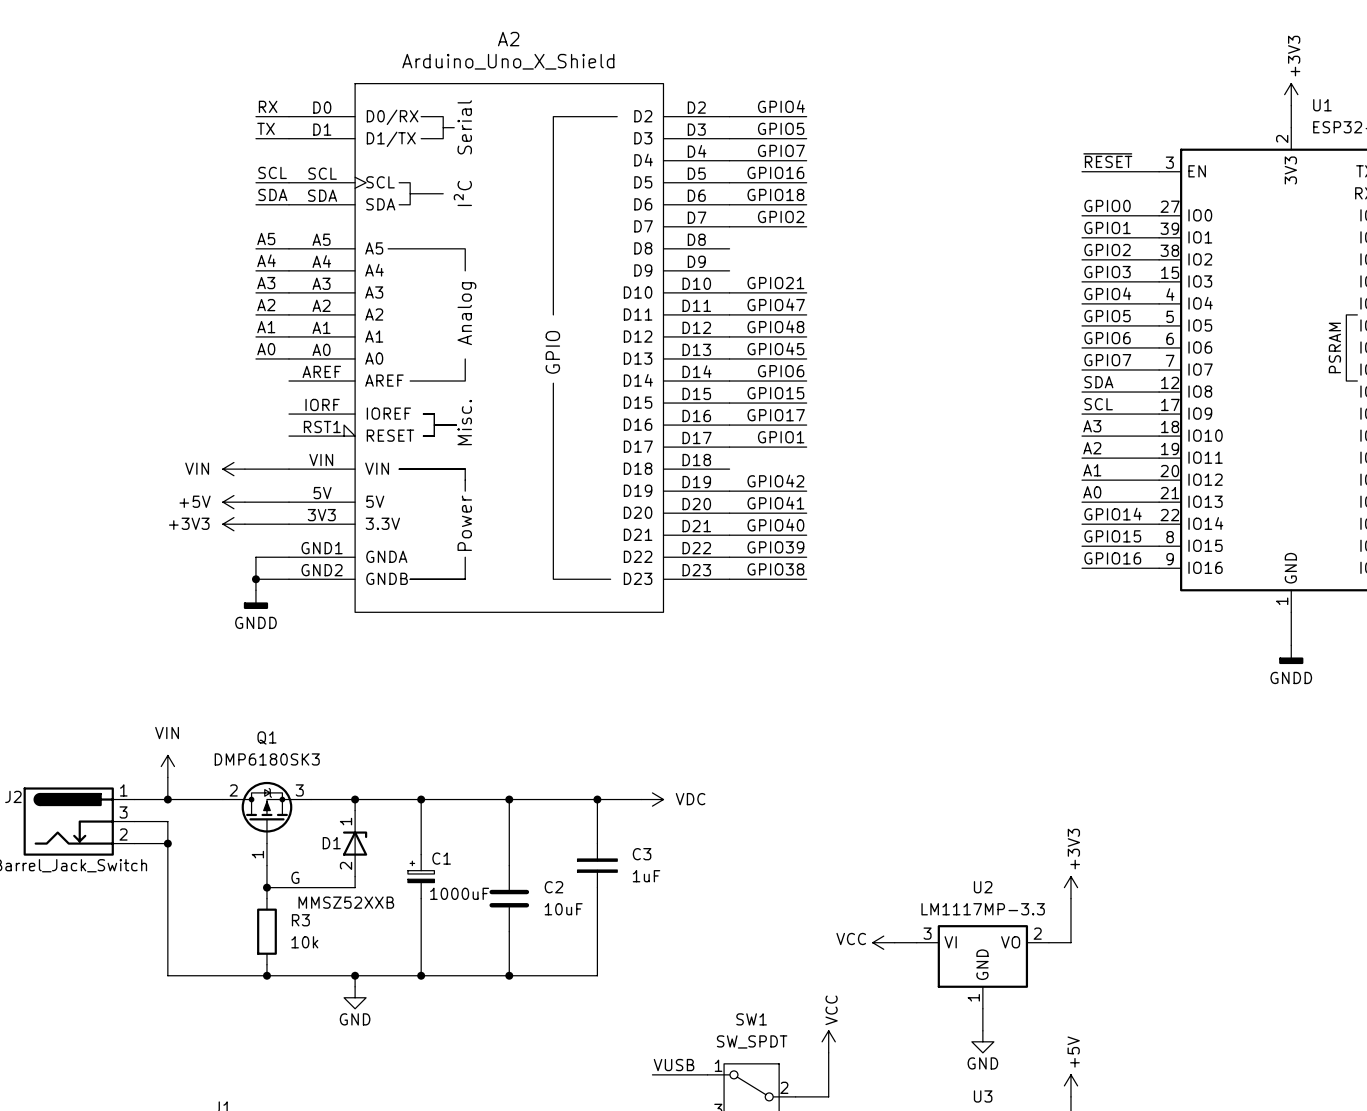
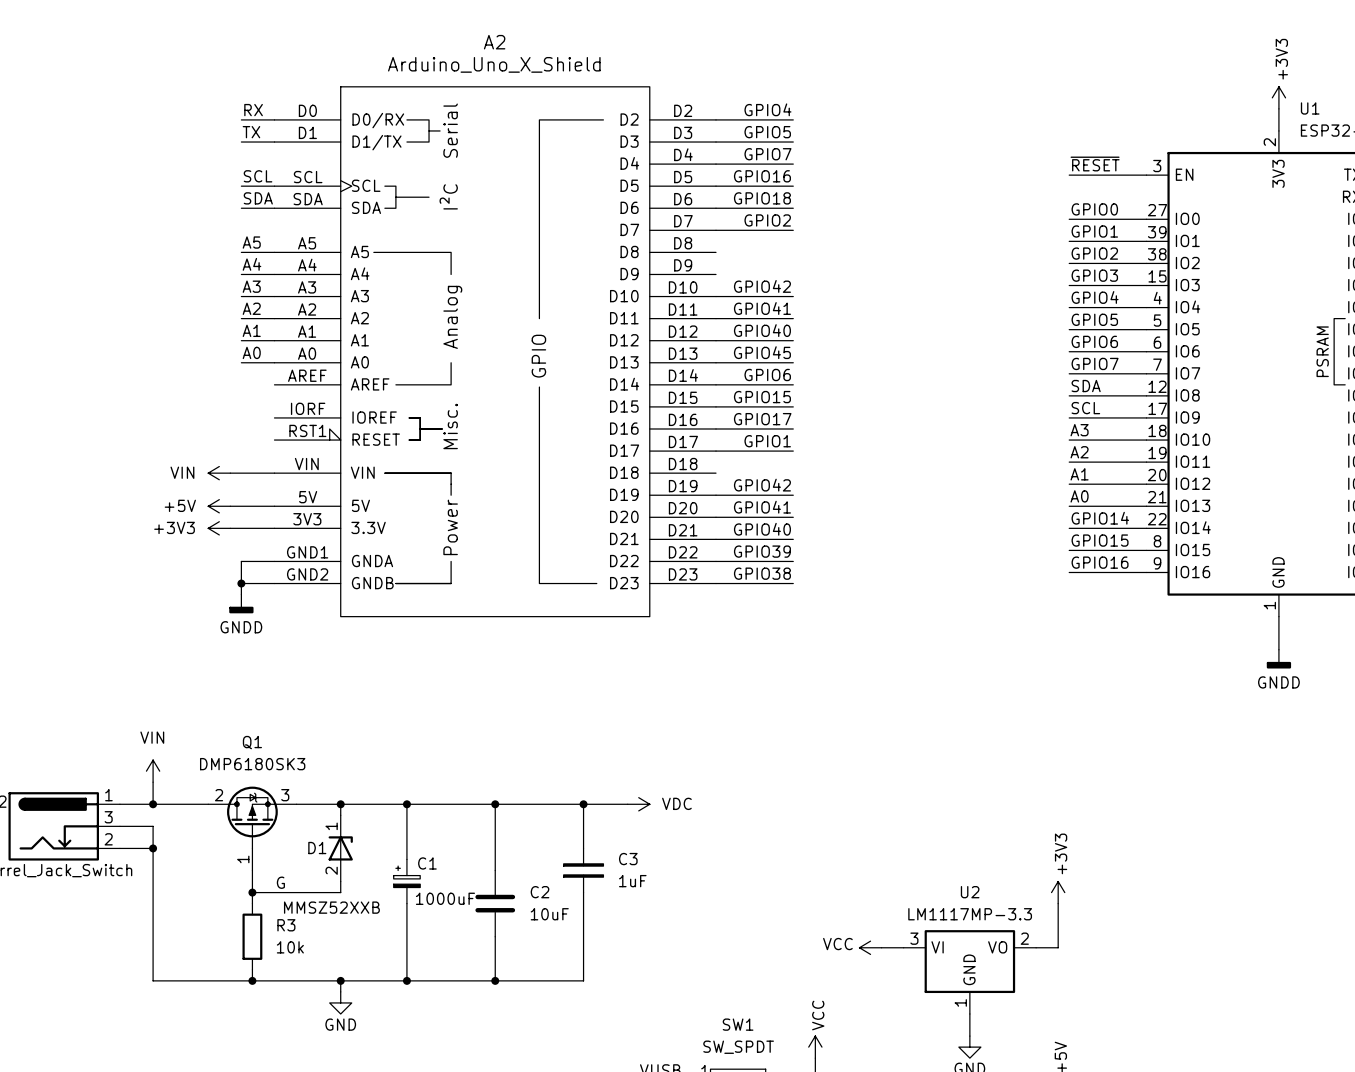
label: GPIO21 (775, 283) -> GPIO42 (762, 286)
label: GPIO47 (776, 304) -> GPIO41 (762, 308)
label: GPIO48 (775, 326) -> GPIO40 (762, 330)

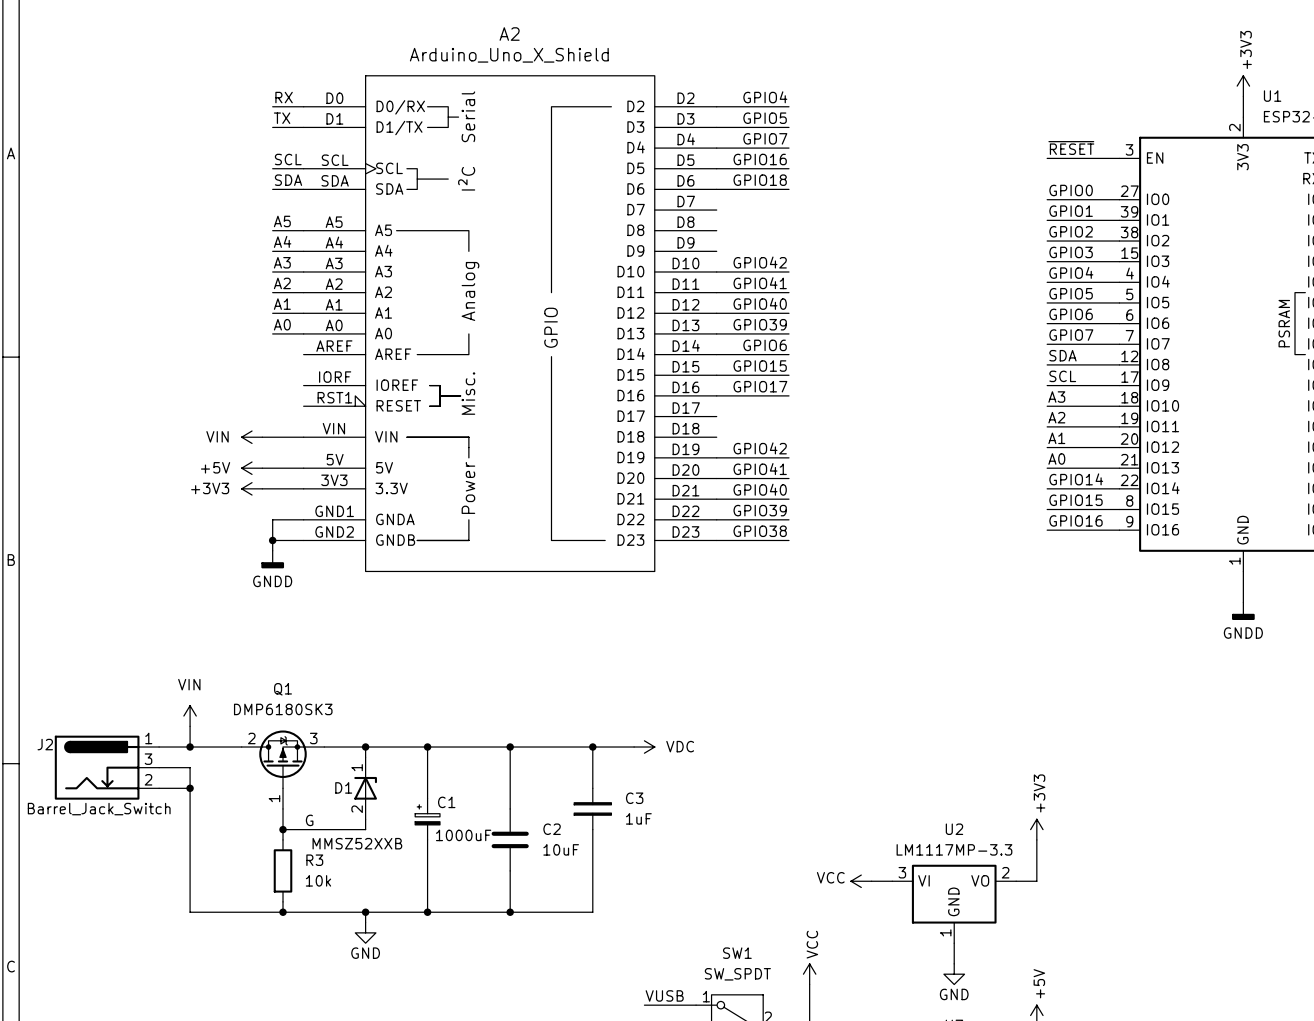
label: GPIO2 (767, 220) -> none
wire: (716, 230) (793, 230) -> none
label: GPIO45 (762, 352) -> GPIO39 (760, 324)
label: GPIO1 (767, 441) -> none
wire: (716, 451) (793, 451) -> none

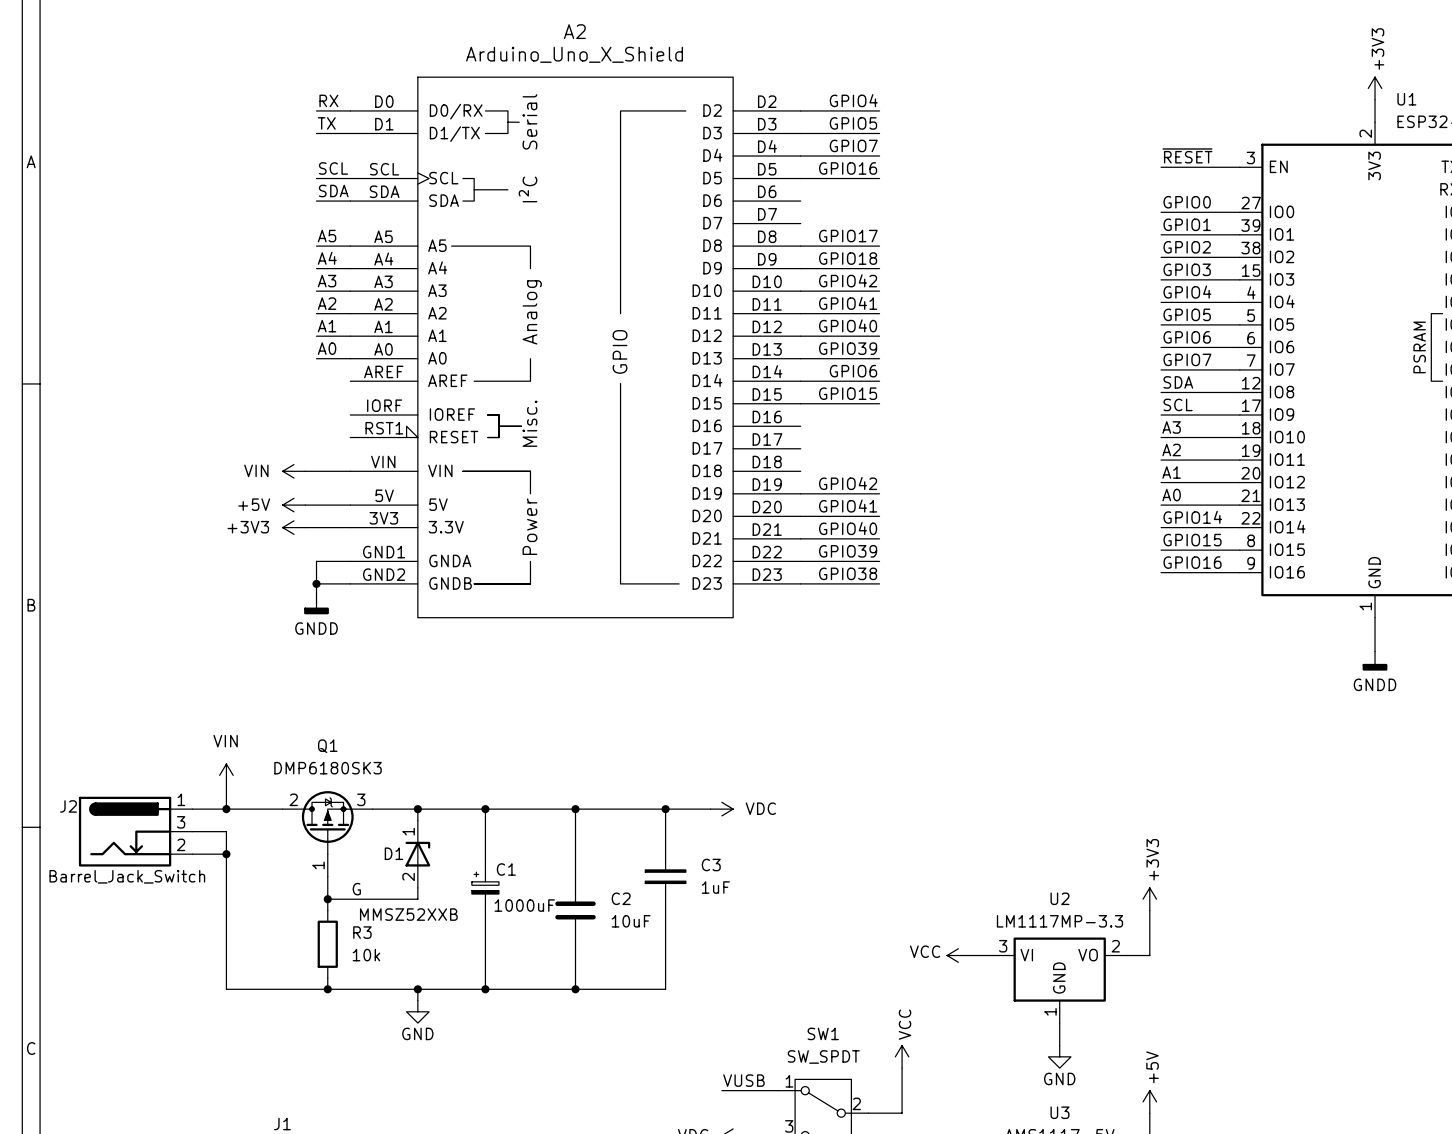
label position: GPIO18 (760, 180) -> GPIO18 (848, 258)
wire: (716, 189) (789, 189) -> (800, 246) (879, 246)
label position: GPIO17 (760, 386) -> GPIO17 (848, 236)
wire: (716, 395) (789, 395) -> (800, 268) (879, 268)

